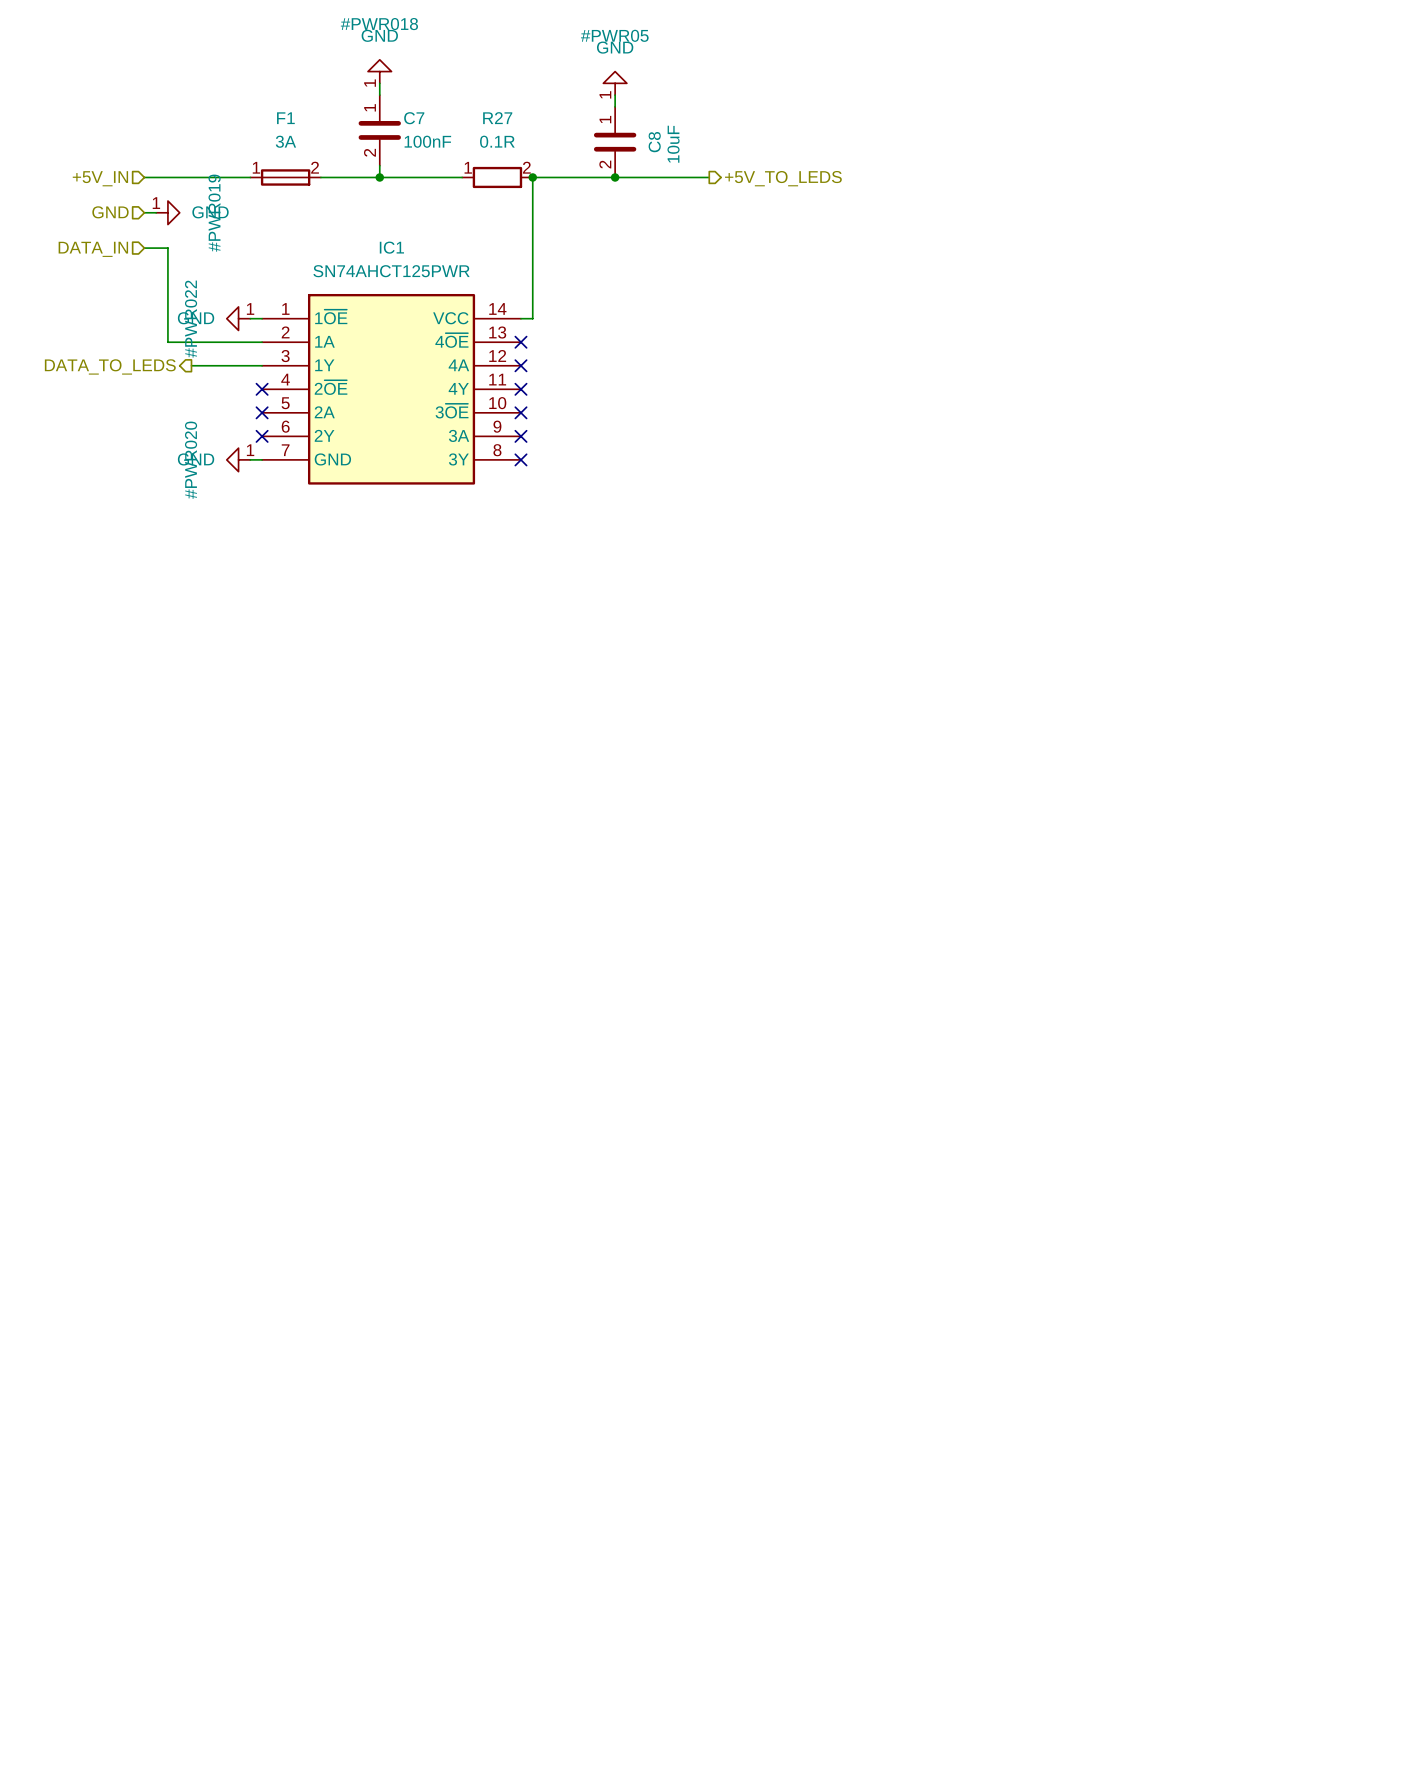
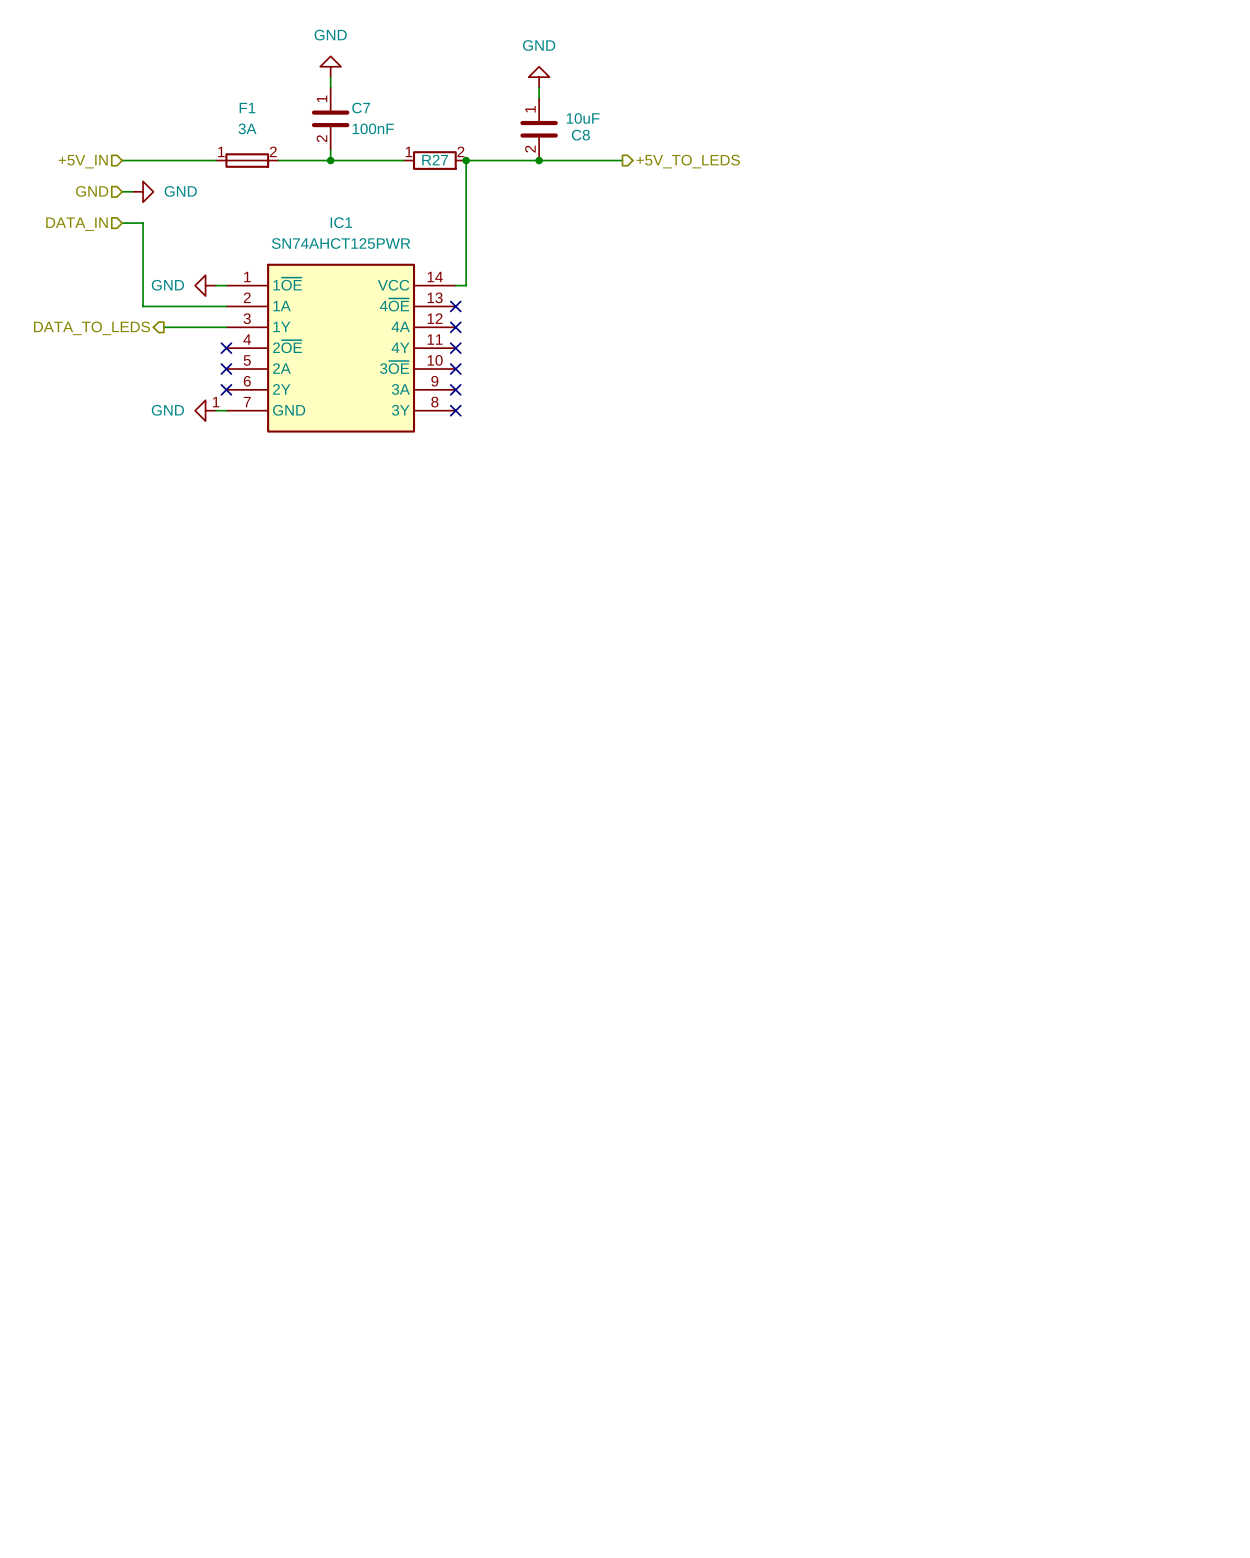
#PWR018 name: #PWR018 (379, 24) -> none
#PWR05 name: #PWR05 (614, 35) -> none
#PWR018 pin number: 1 (370, 83) -> none
#PWR05 pin number: 1 (605, 94) -> none
R27 name position: R27 (497, 118) -> R27 (435, 160)
R27 value: 0.1R (497, 141) -> none
C8 name rotation: 0° (654, 142) -> 90° clockwise (580, 135)
C8 value rotation: 0° (673, 144) -> 90° clockwise (583, 118)
#PWR019 pin number: 1 (156, 203) -> none
#PWR019 name: #PWR019 (214, 213) -> none
#PWR022 pin number: 1 (250, 308) -> none
#PWR022 name: #PWR022 (191, 319) -> none
#PWR020 name: #PWR020 (191, 460) -> none

